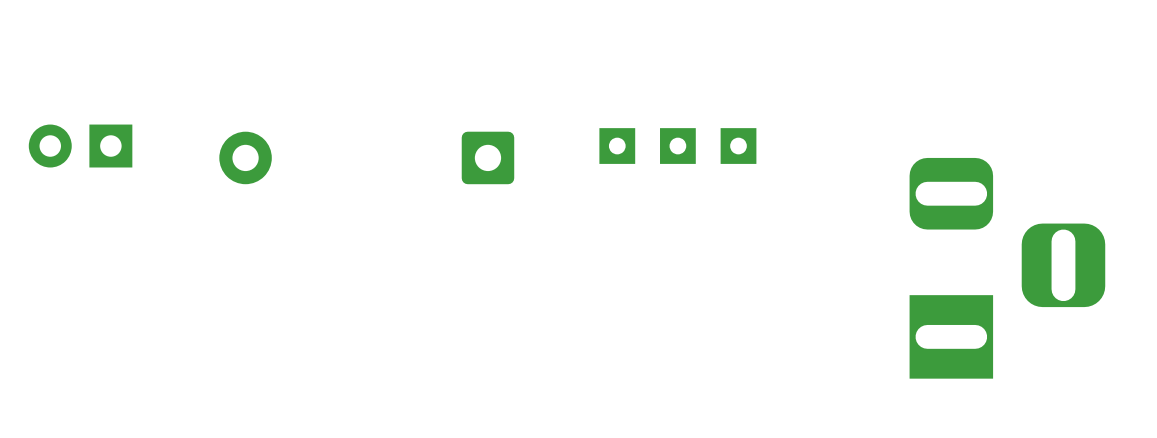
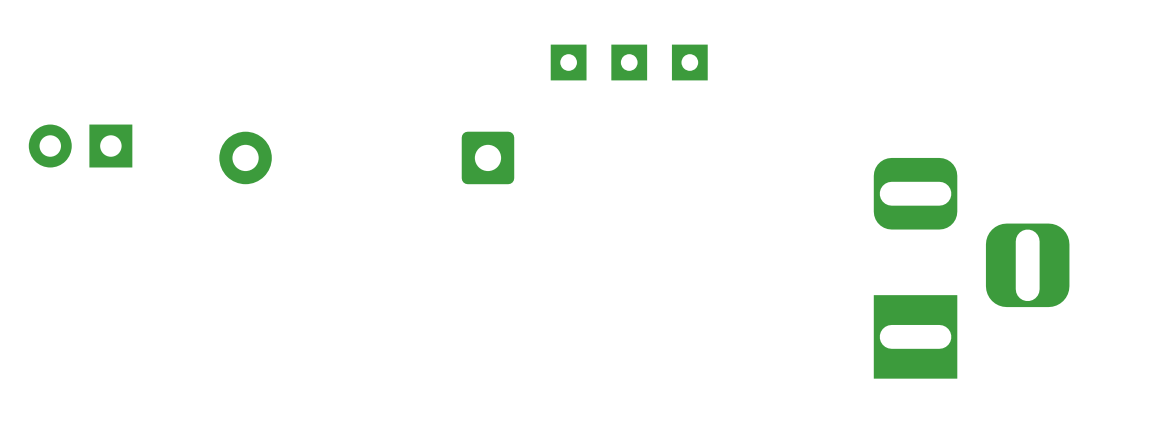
part position: (677, 146) -> (629, 62)
part position: (1007, 268) -> (971, 268)

